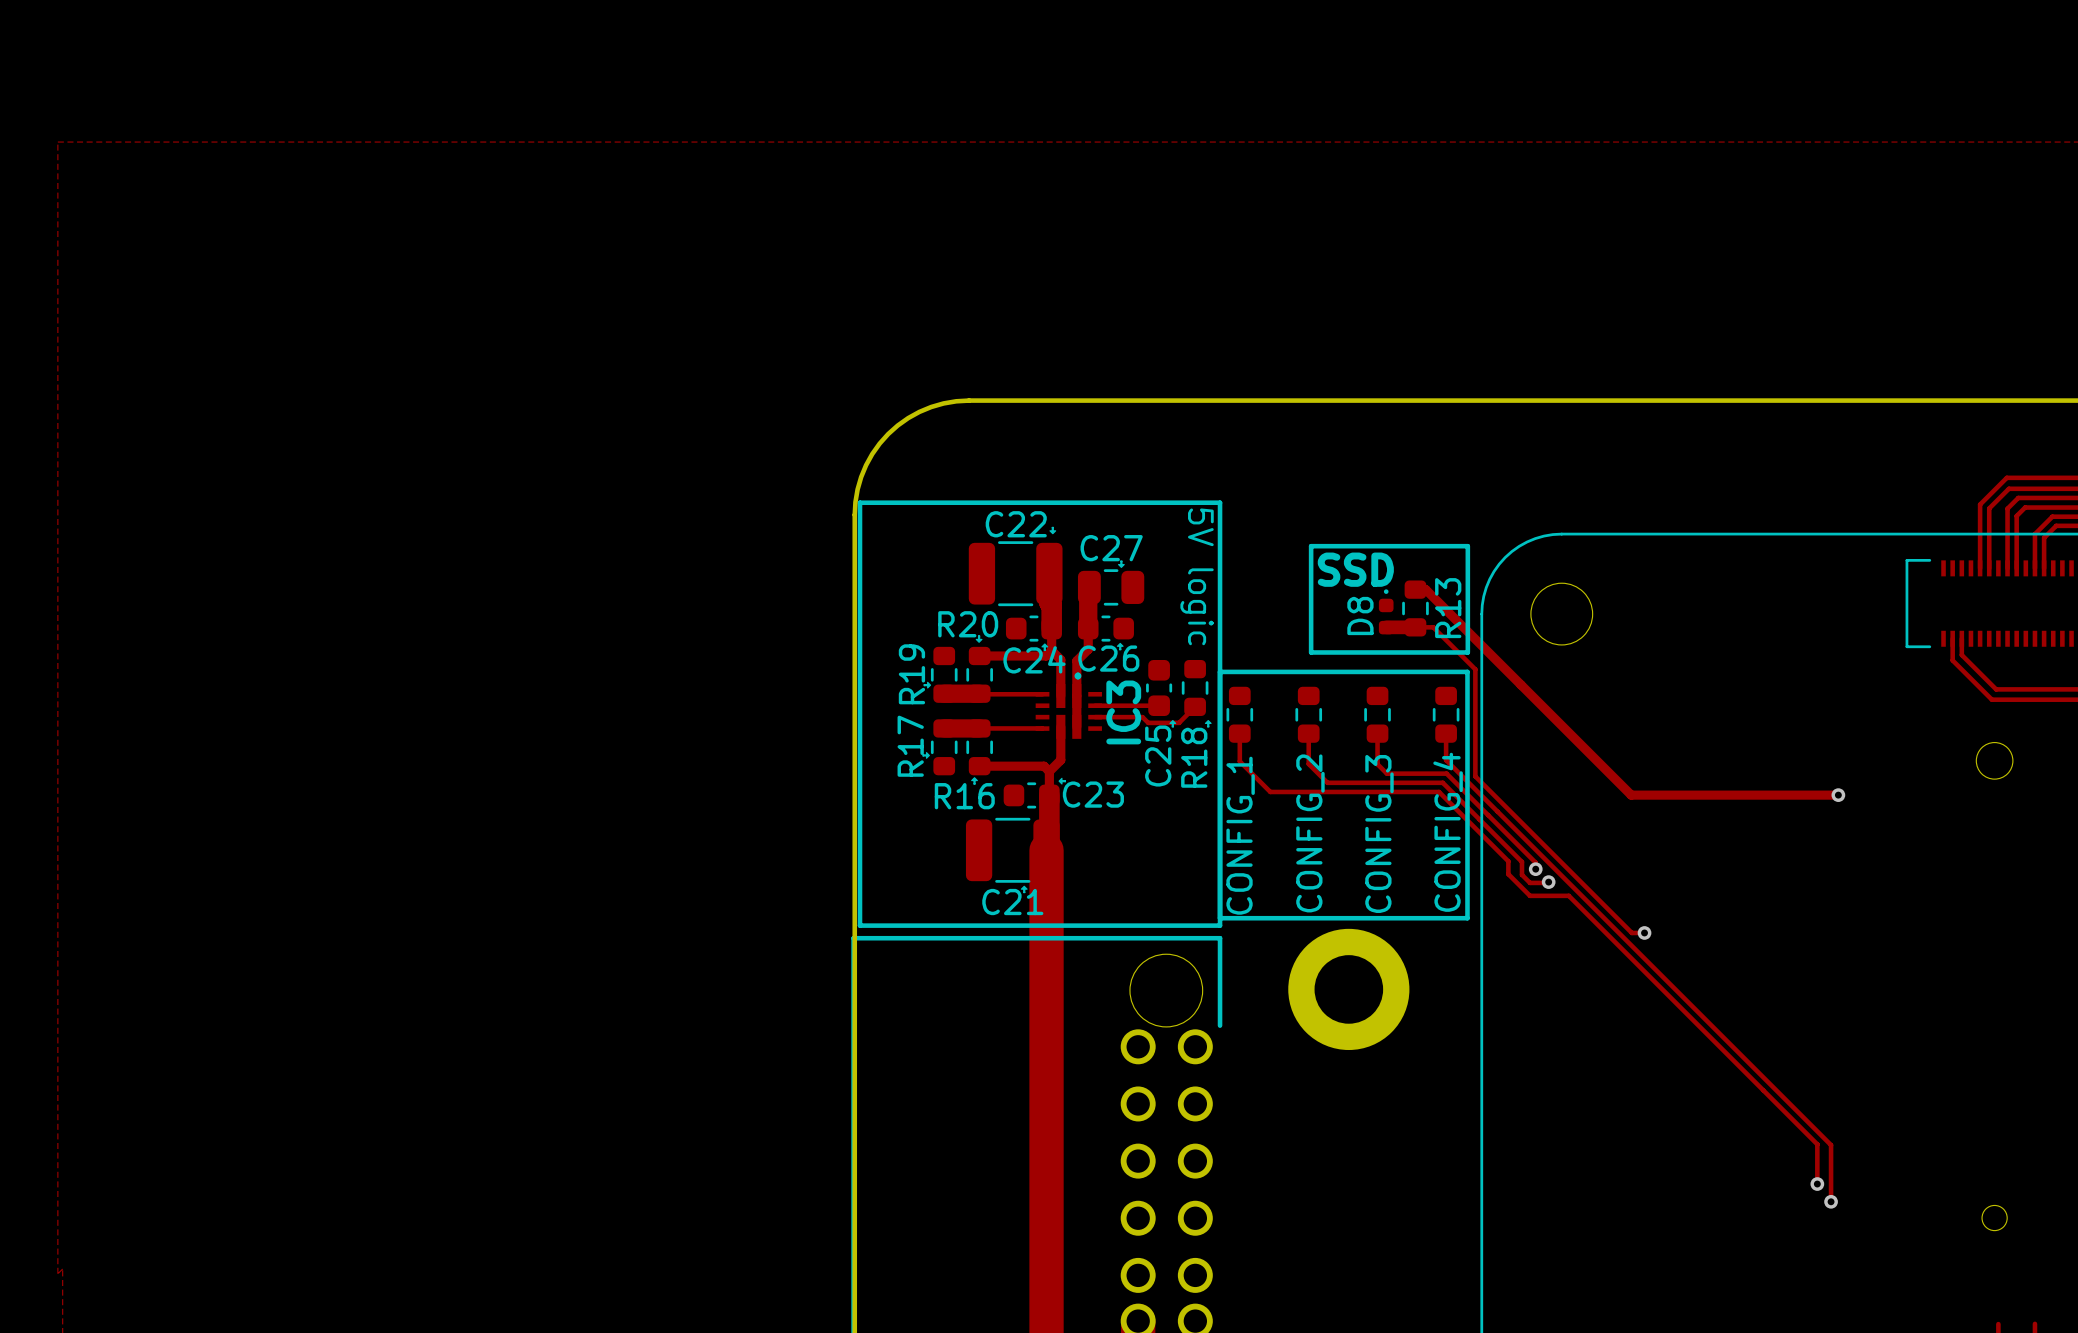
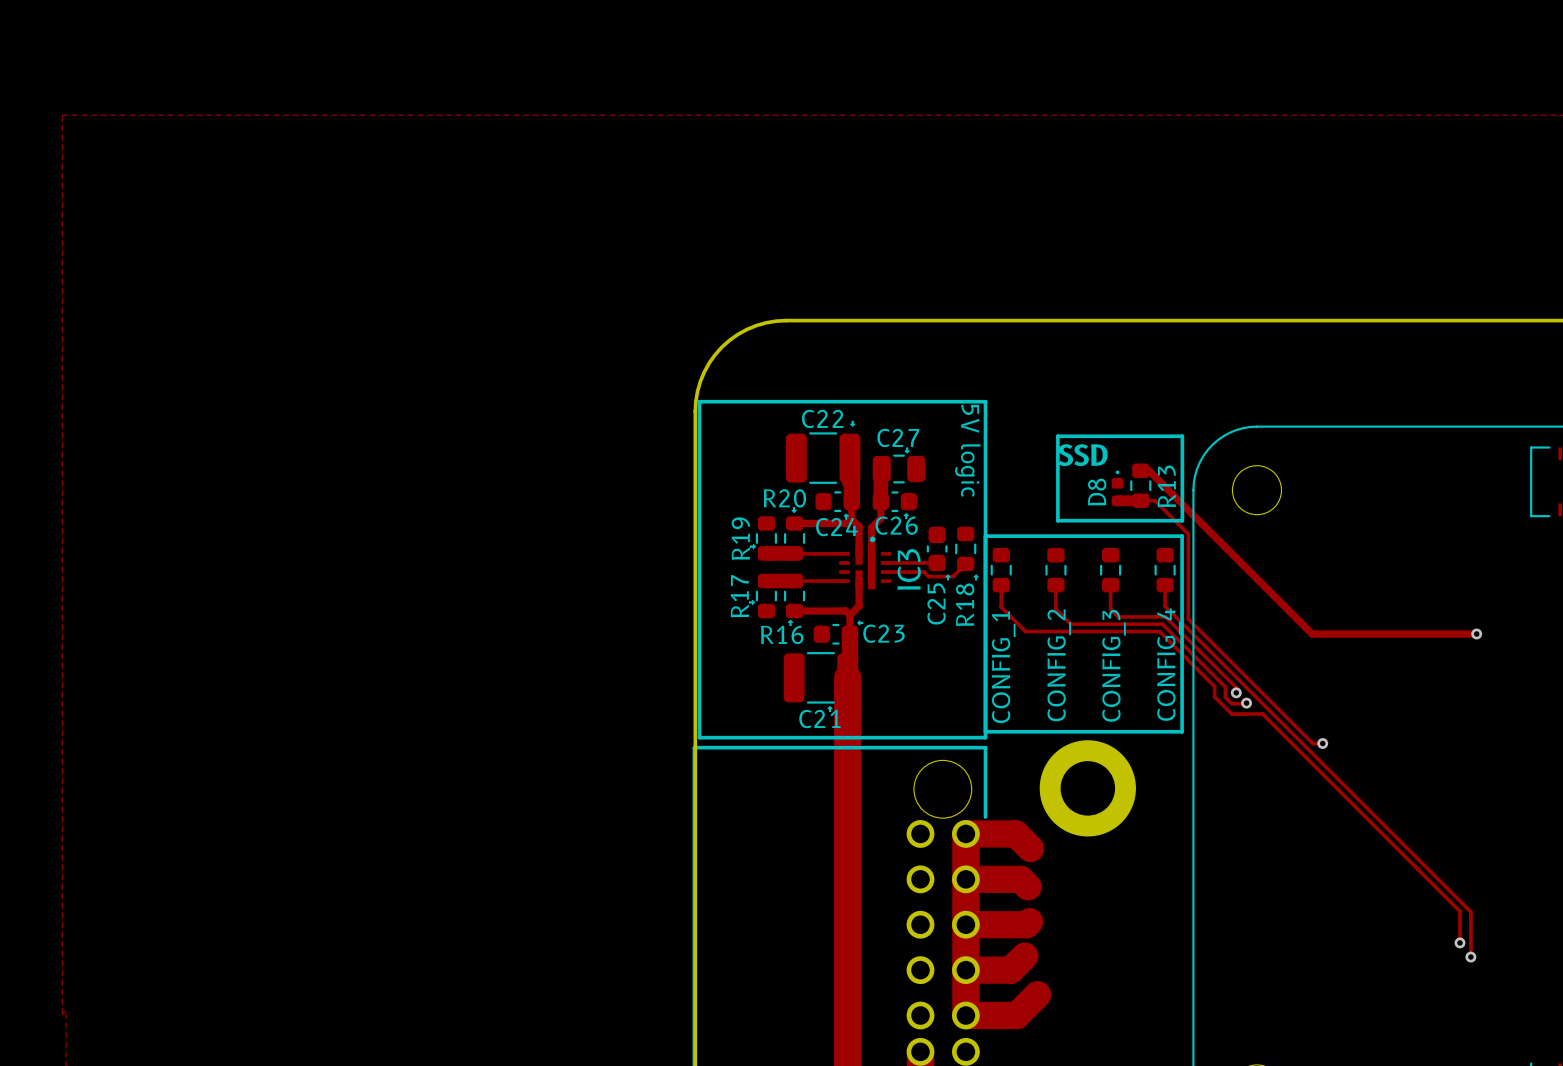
track: none -> (1030, 848) (1015, 833) (965, 833) (965, 1015) (1016, 1015) (1037, 994)
track: none -> (965, 879) (1020, 879) (1028, 886)
track: none -> (1029, 921) (1026, 924) (965, 924)
track: none -> (1024, 955) (1010, 970) (965, 970)

